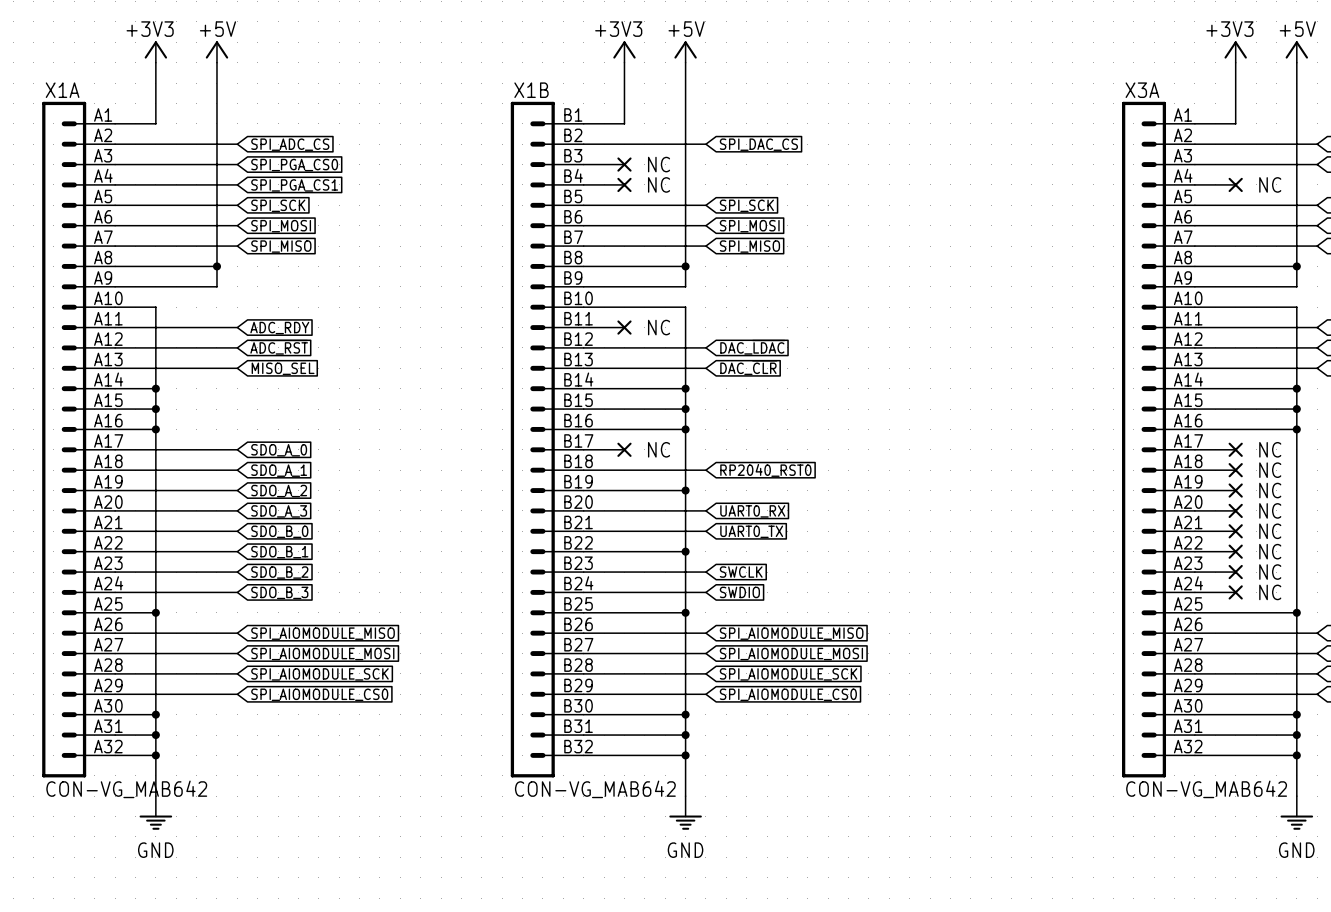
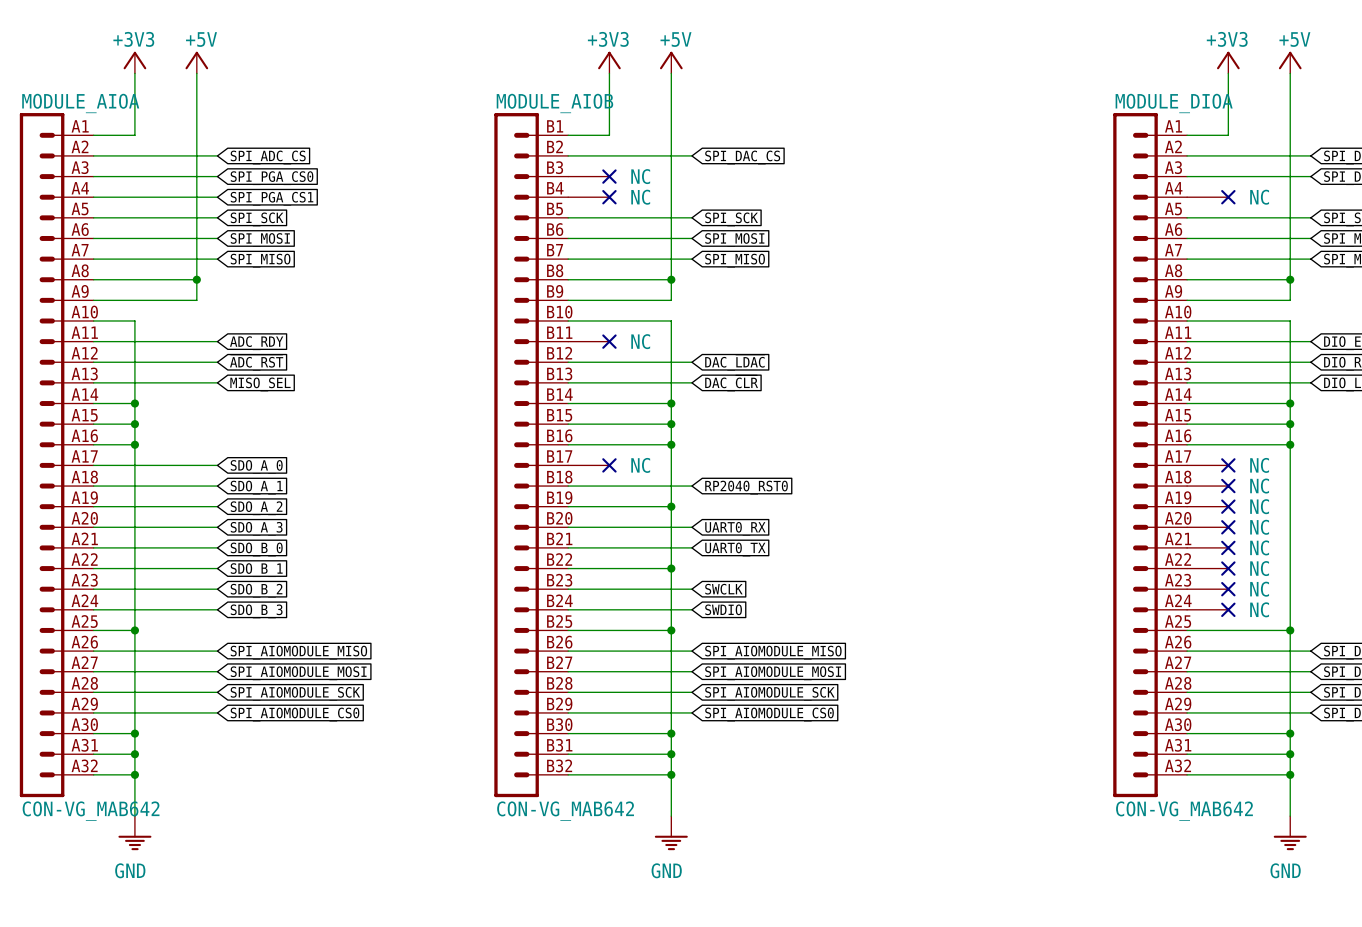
X1A name: X1A (62, 90) -> MODULE_AIOA (80, 103)
X1B name: X1B (531, 90) -> MODULE_AIOB (554, 103)
X3A name: X3A (1142, 90) -> MODULE_DIOA (1174, 103)

